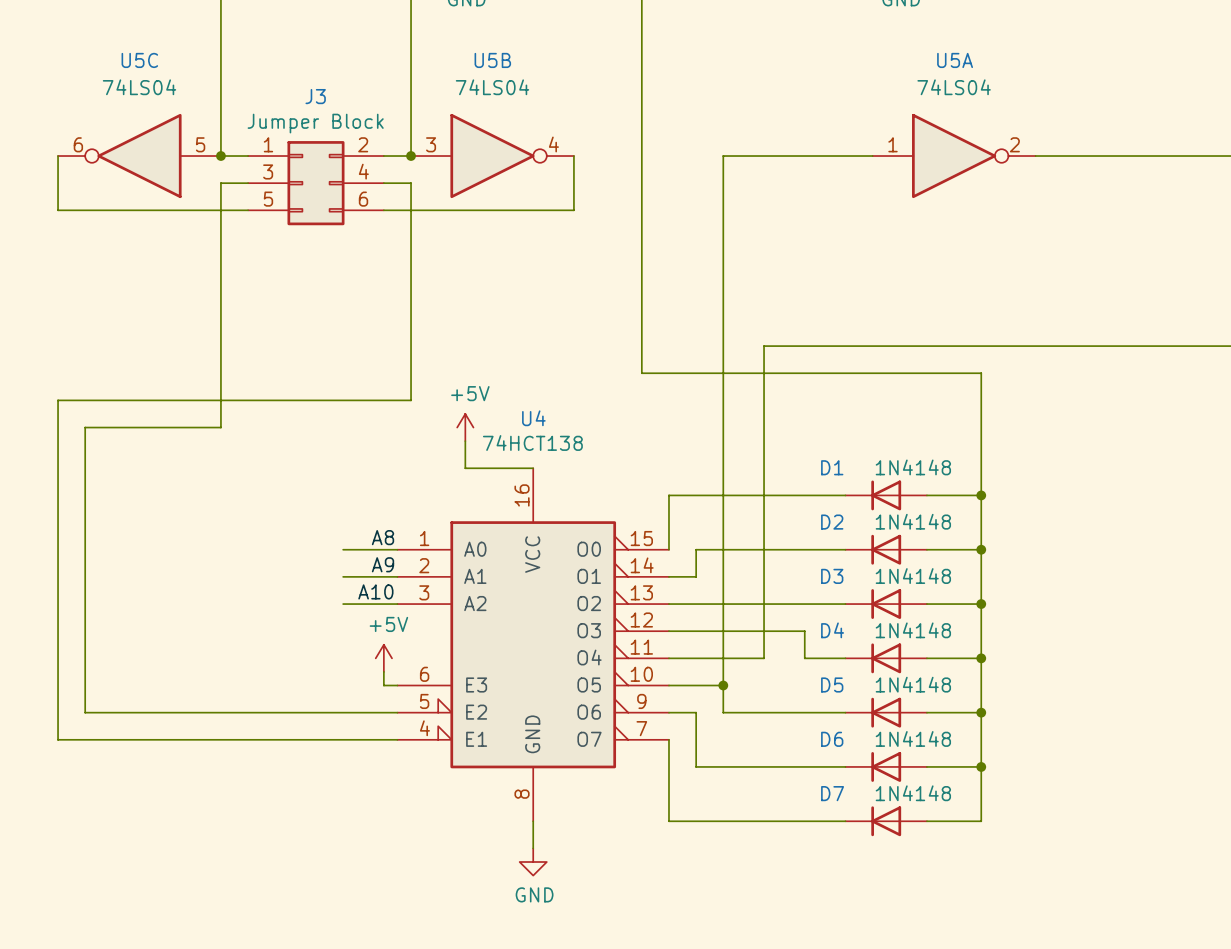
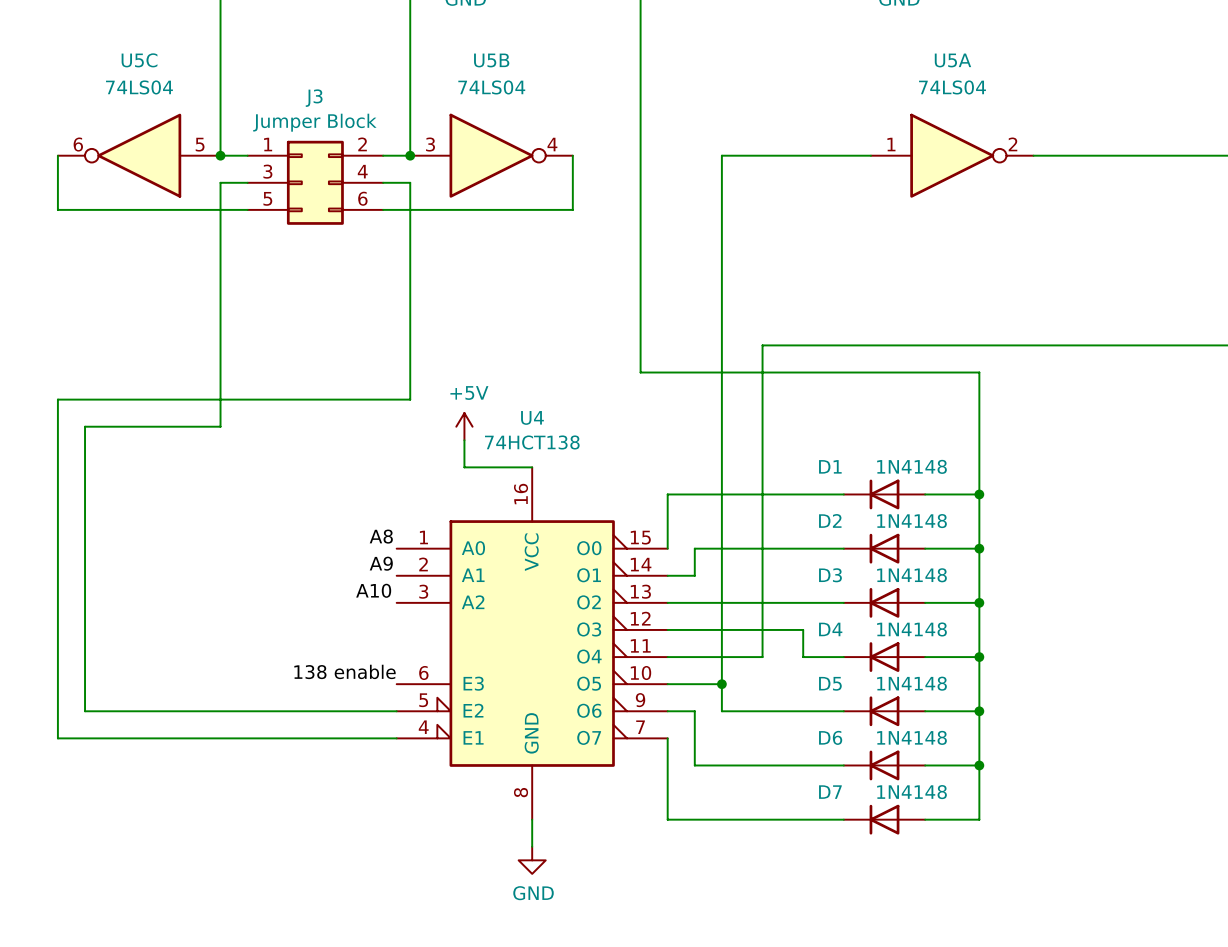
wire: (343, 549) (397, 549) -> none
wire: (343, 576) (397, 576) -> none
wire: (343, 604) (397, 604) -> none
power symbol: +5V (383, 658) -> none
wire: (383, 671) (383, 685) (397, 685) -> none
label: none -> 138 enable (345, 671)

